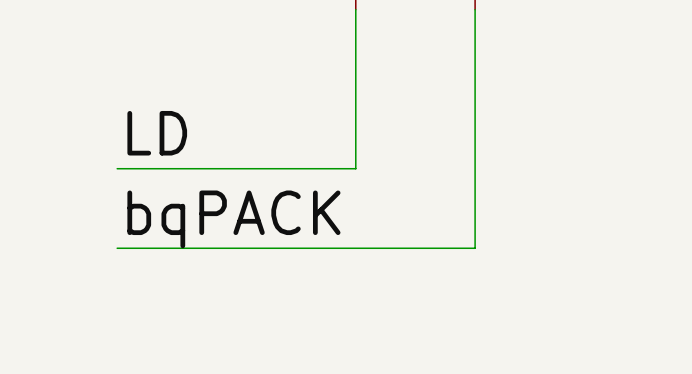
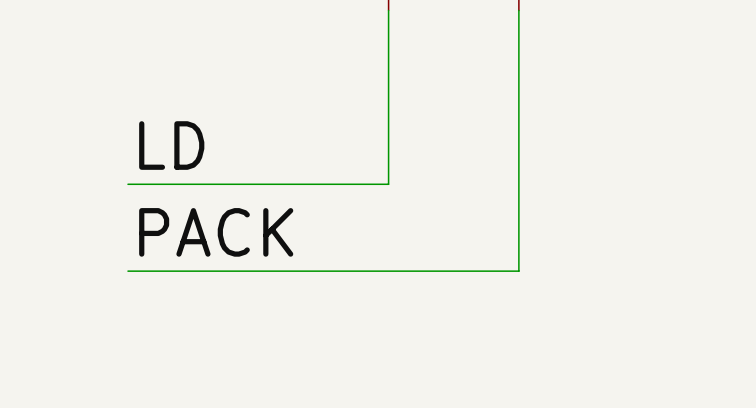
label: bqPACK (233, 219) -> PACK (216, 232)

